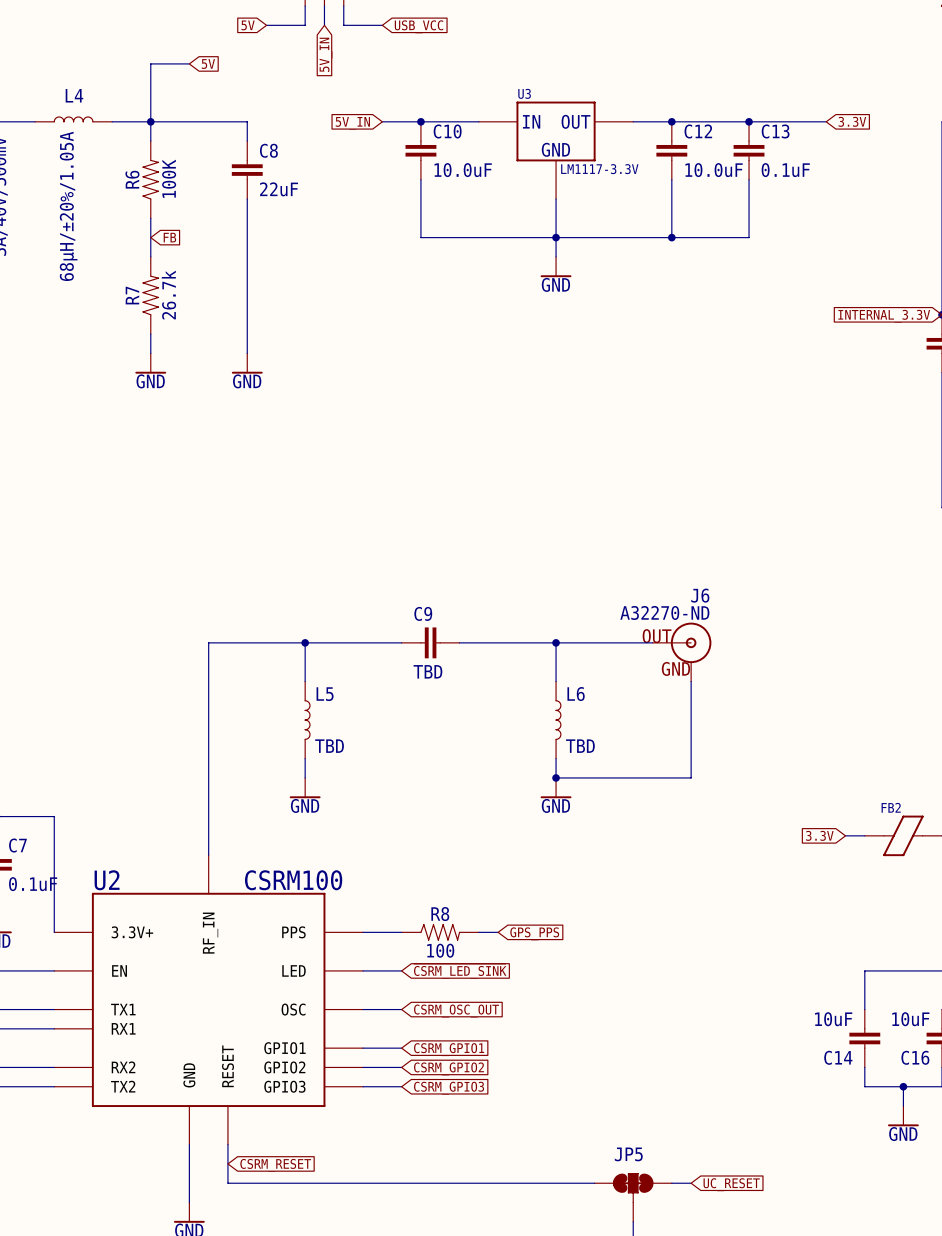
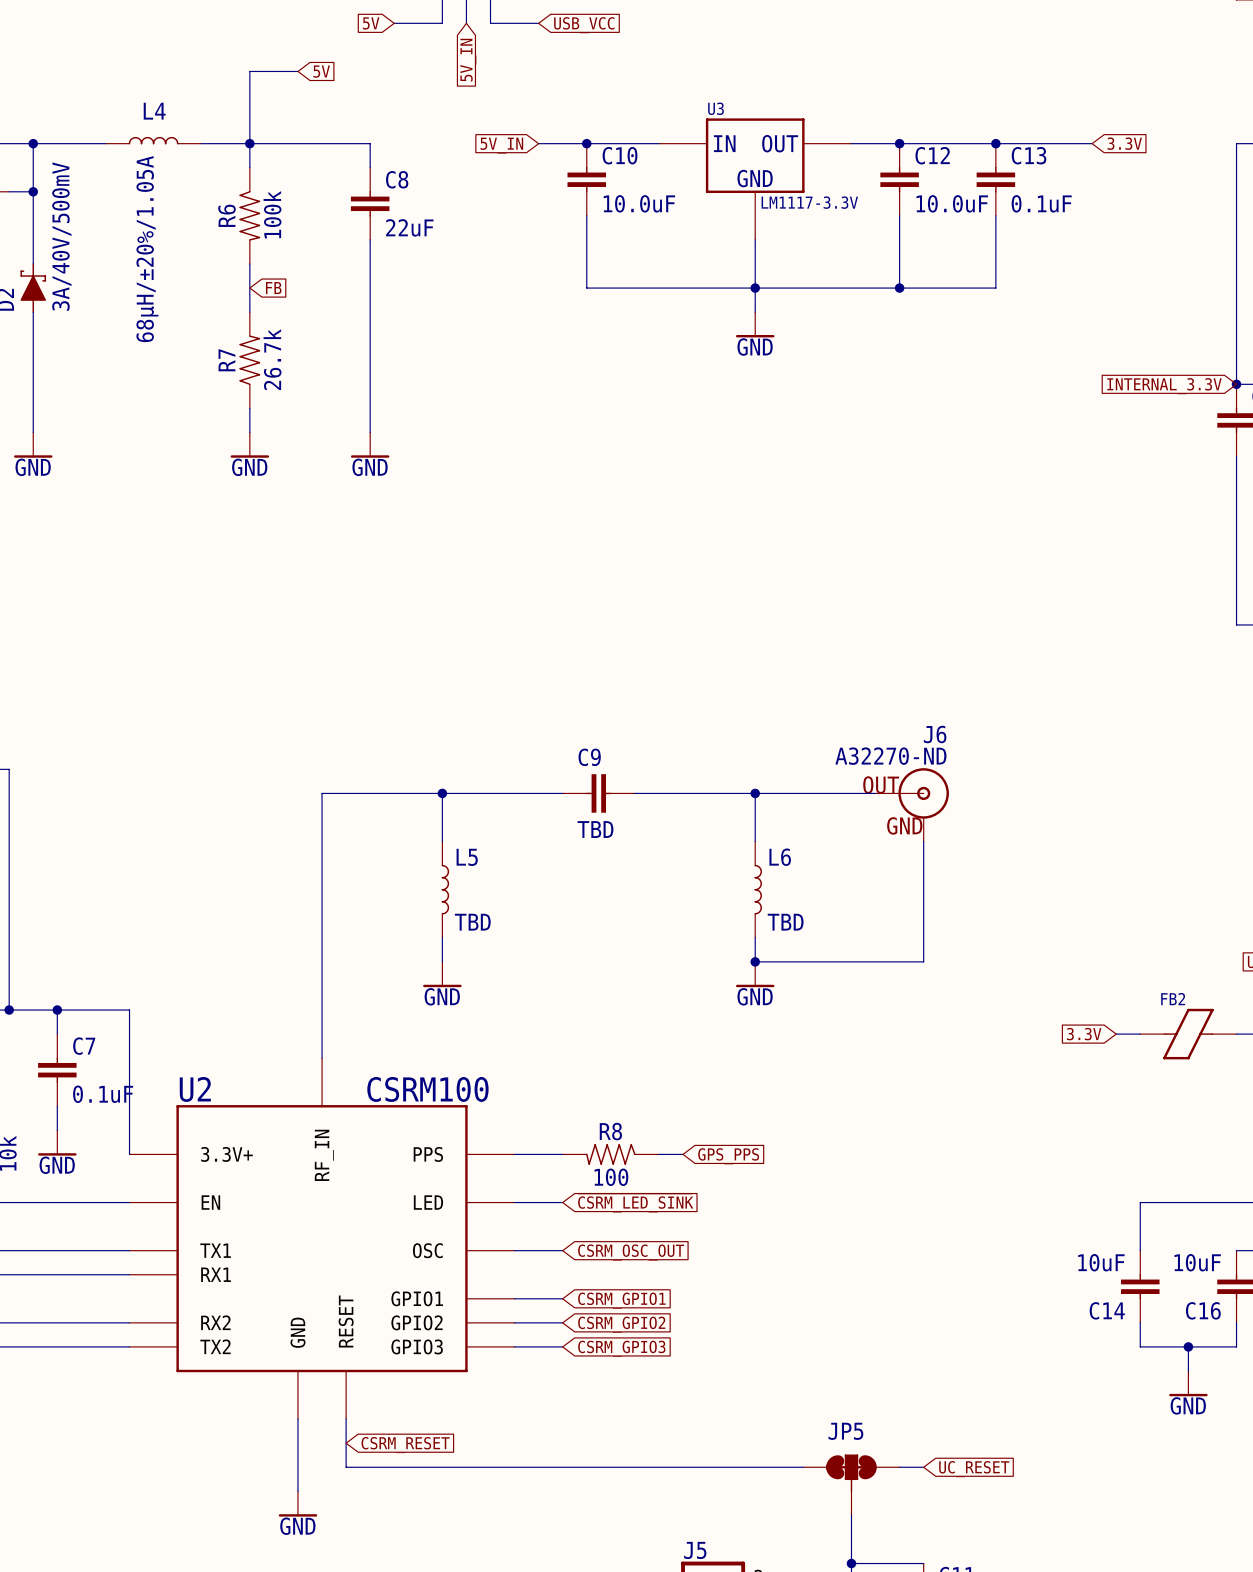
R6 value: 100K (169, 178) -> 100k (272, 214)
R6 flip: as is (150, 179) -> up-down (249, 215)
R8 flip: as is (440, 932) -> left-right (610, 1154)

